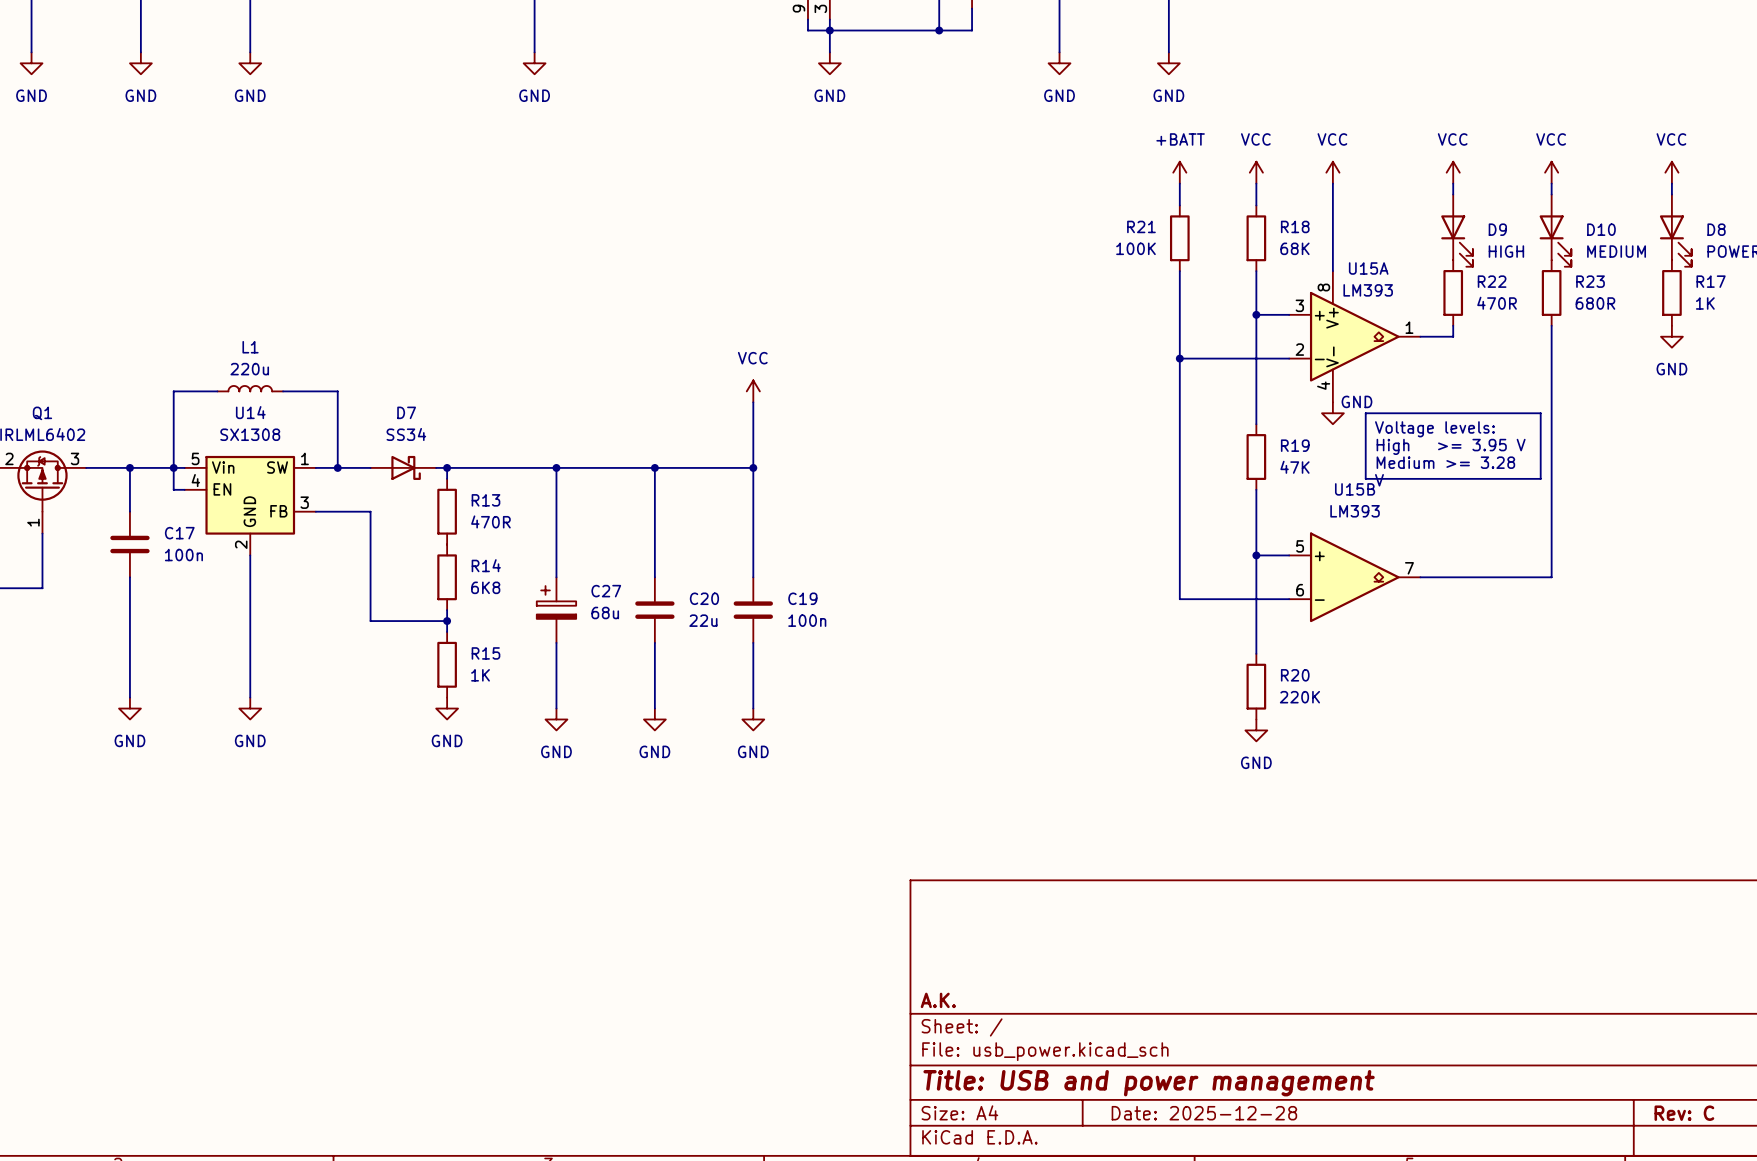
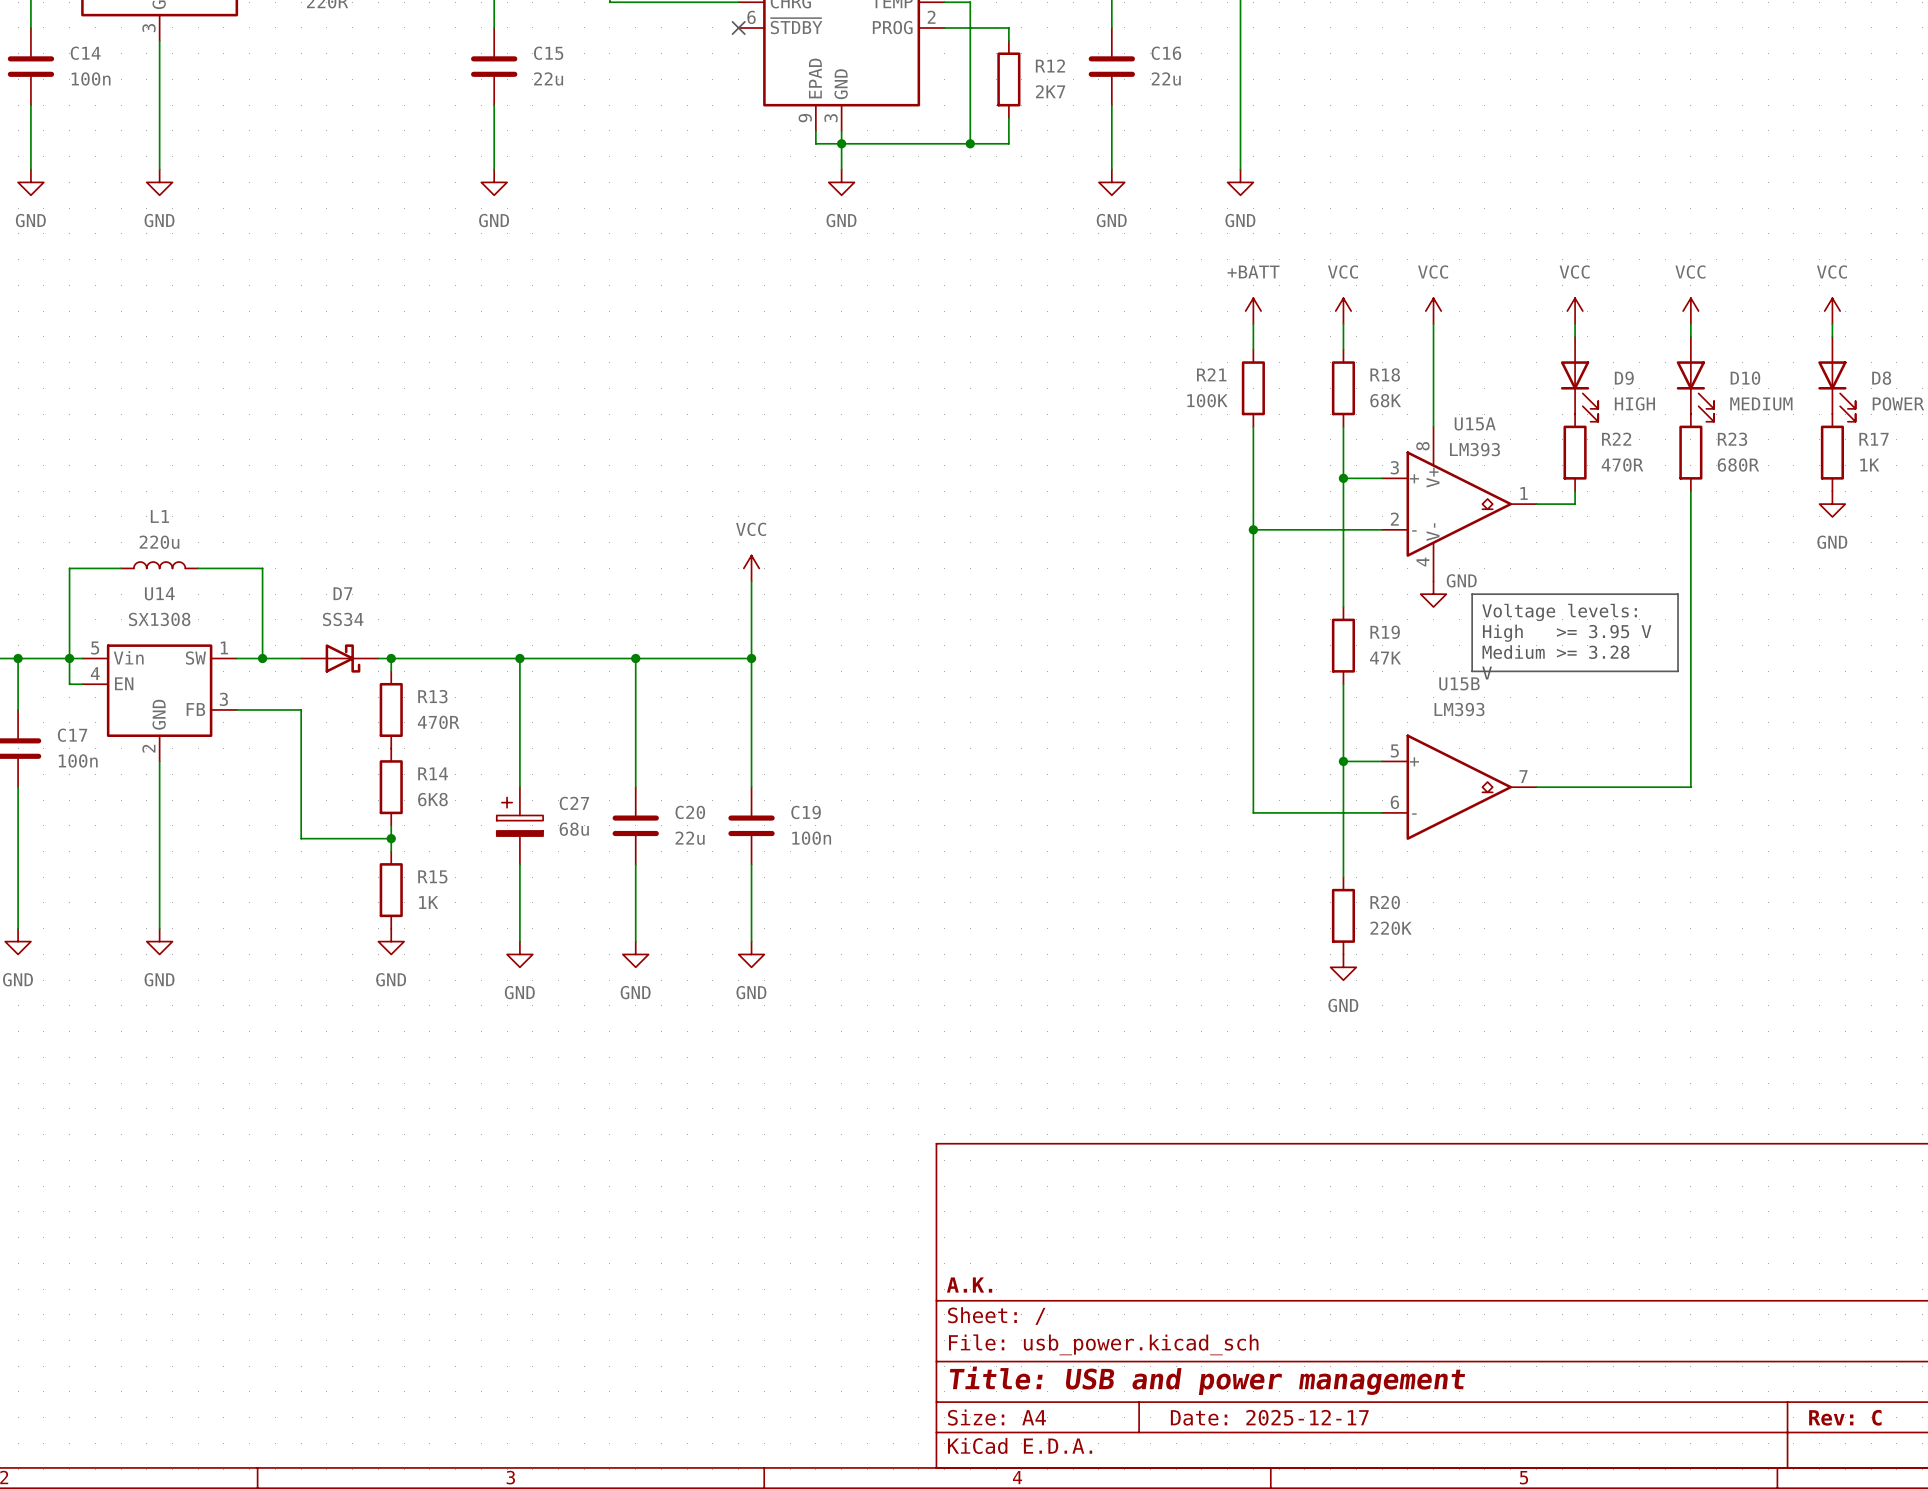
title block: Date: 2025-12-28 (1204, 1113) -> Date: 2025-12-17 (1269, 1417)

